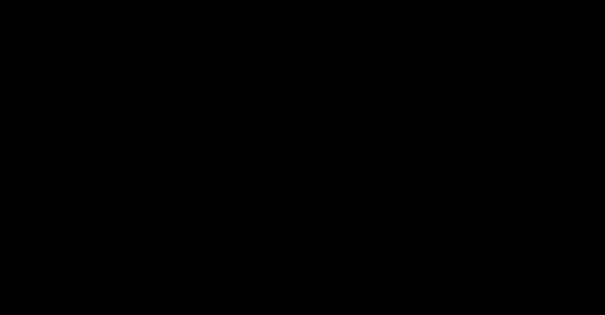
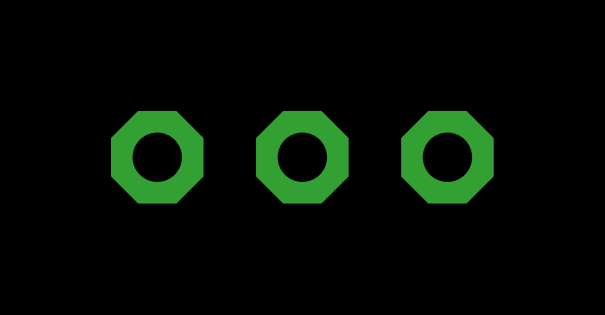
part: none -> (302, 157)

